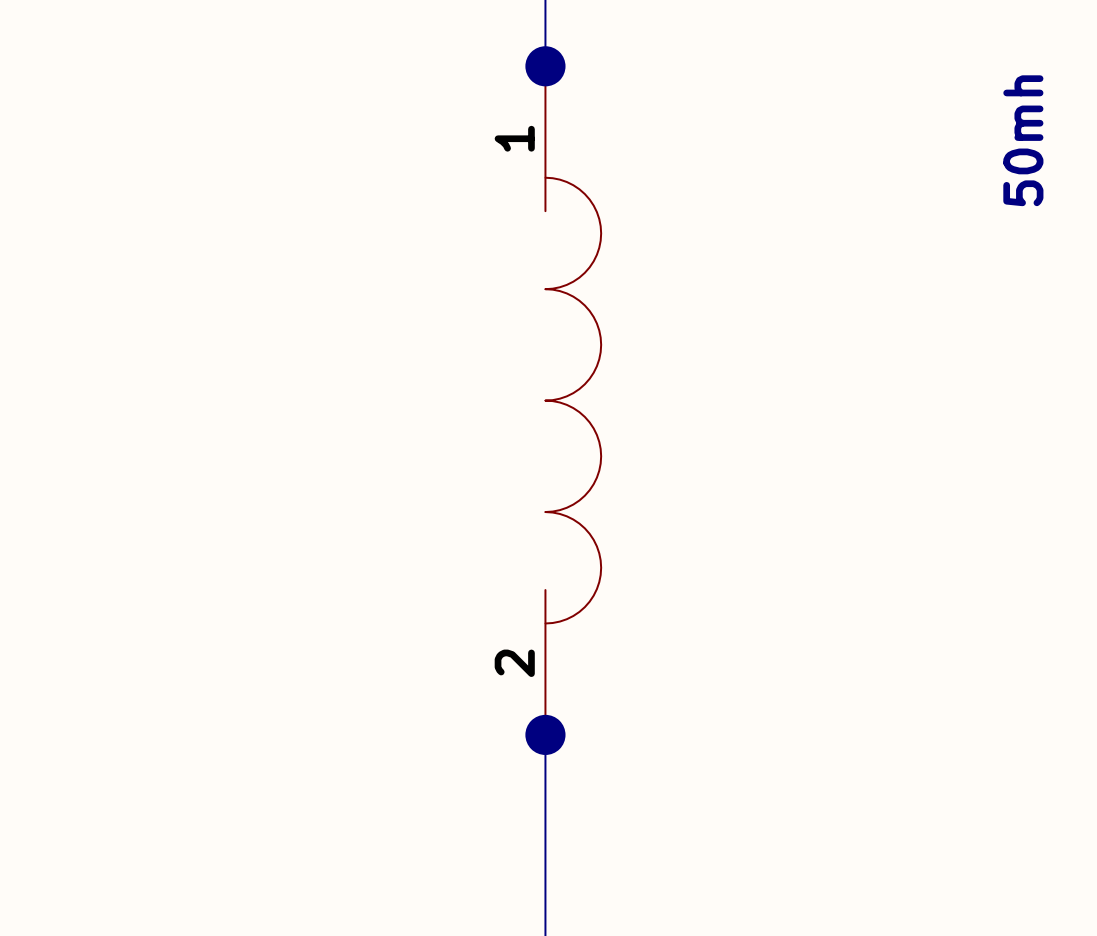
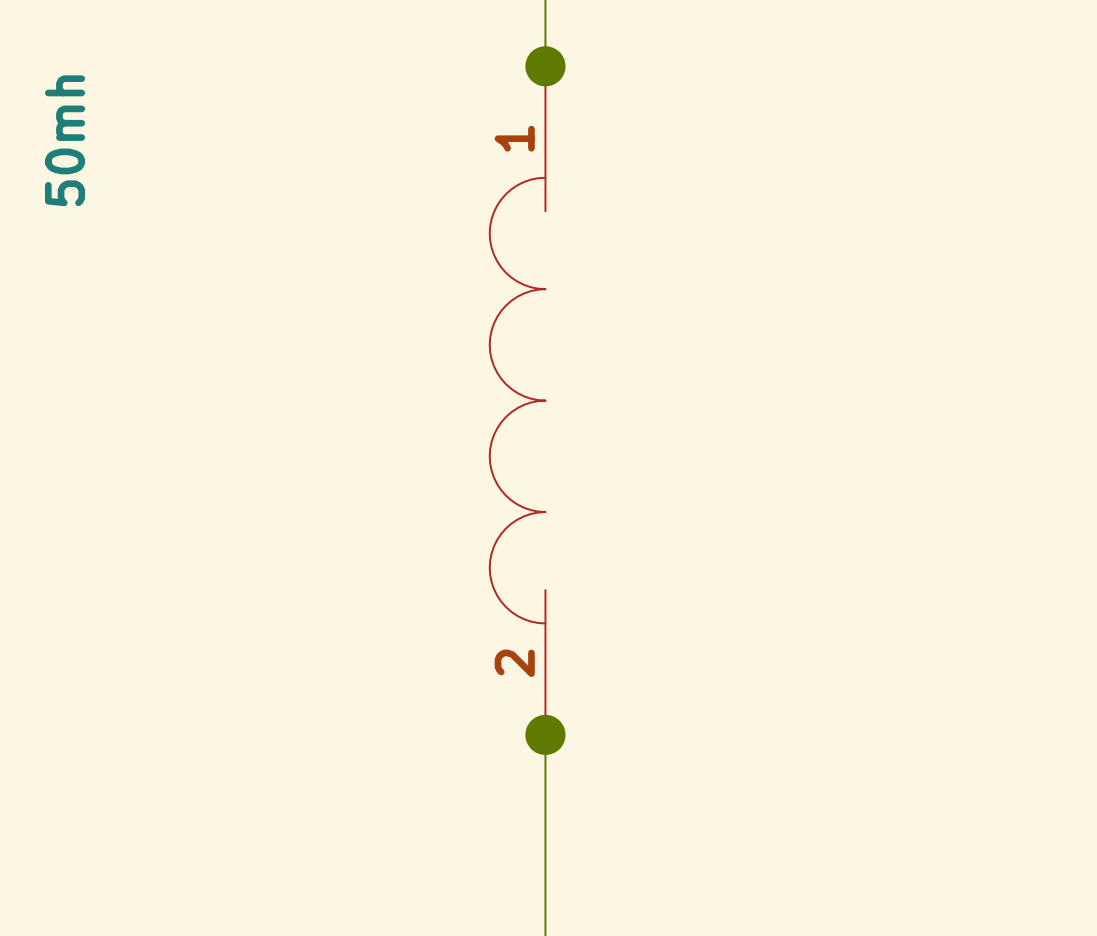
part: none -> 50mh (517, 400)
part: 50mh (573, 400) -> none

